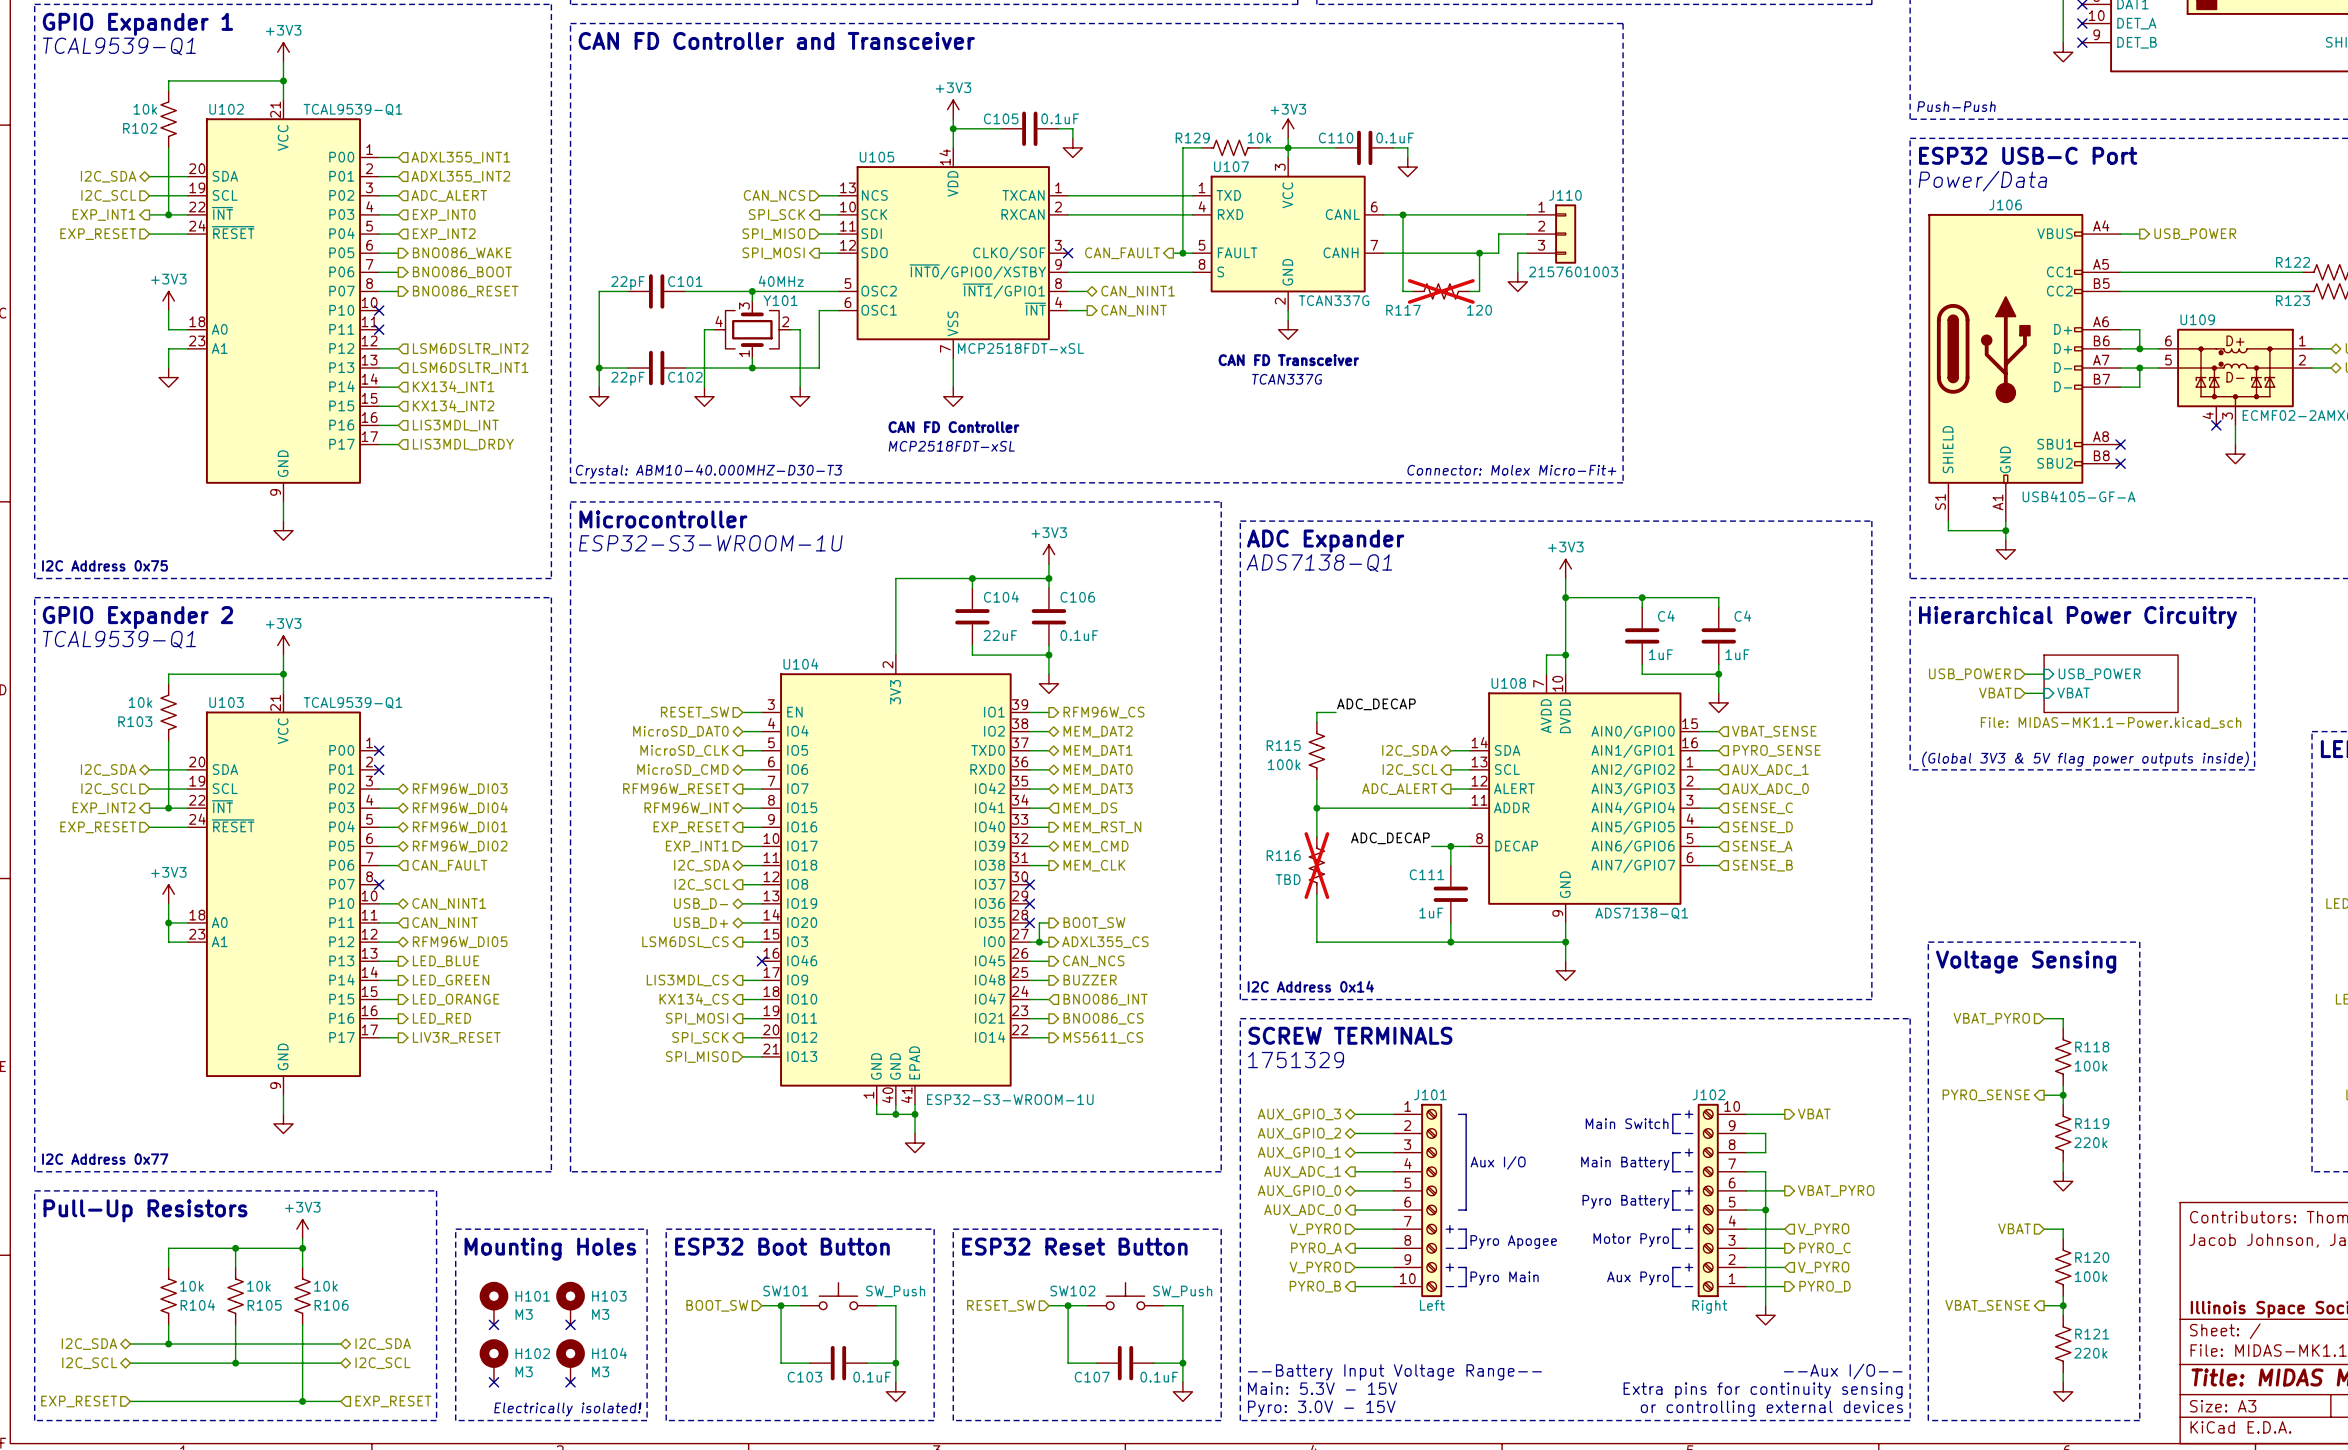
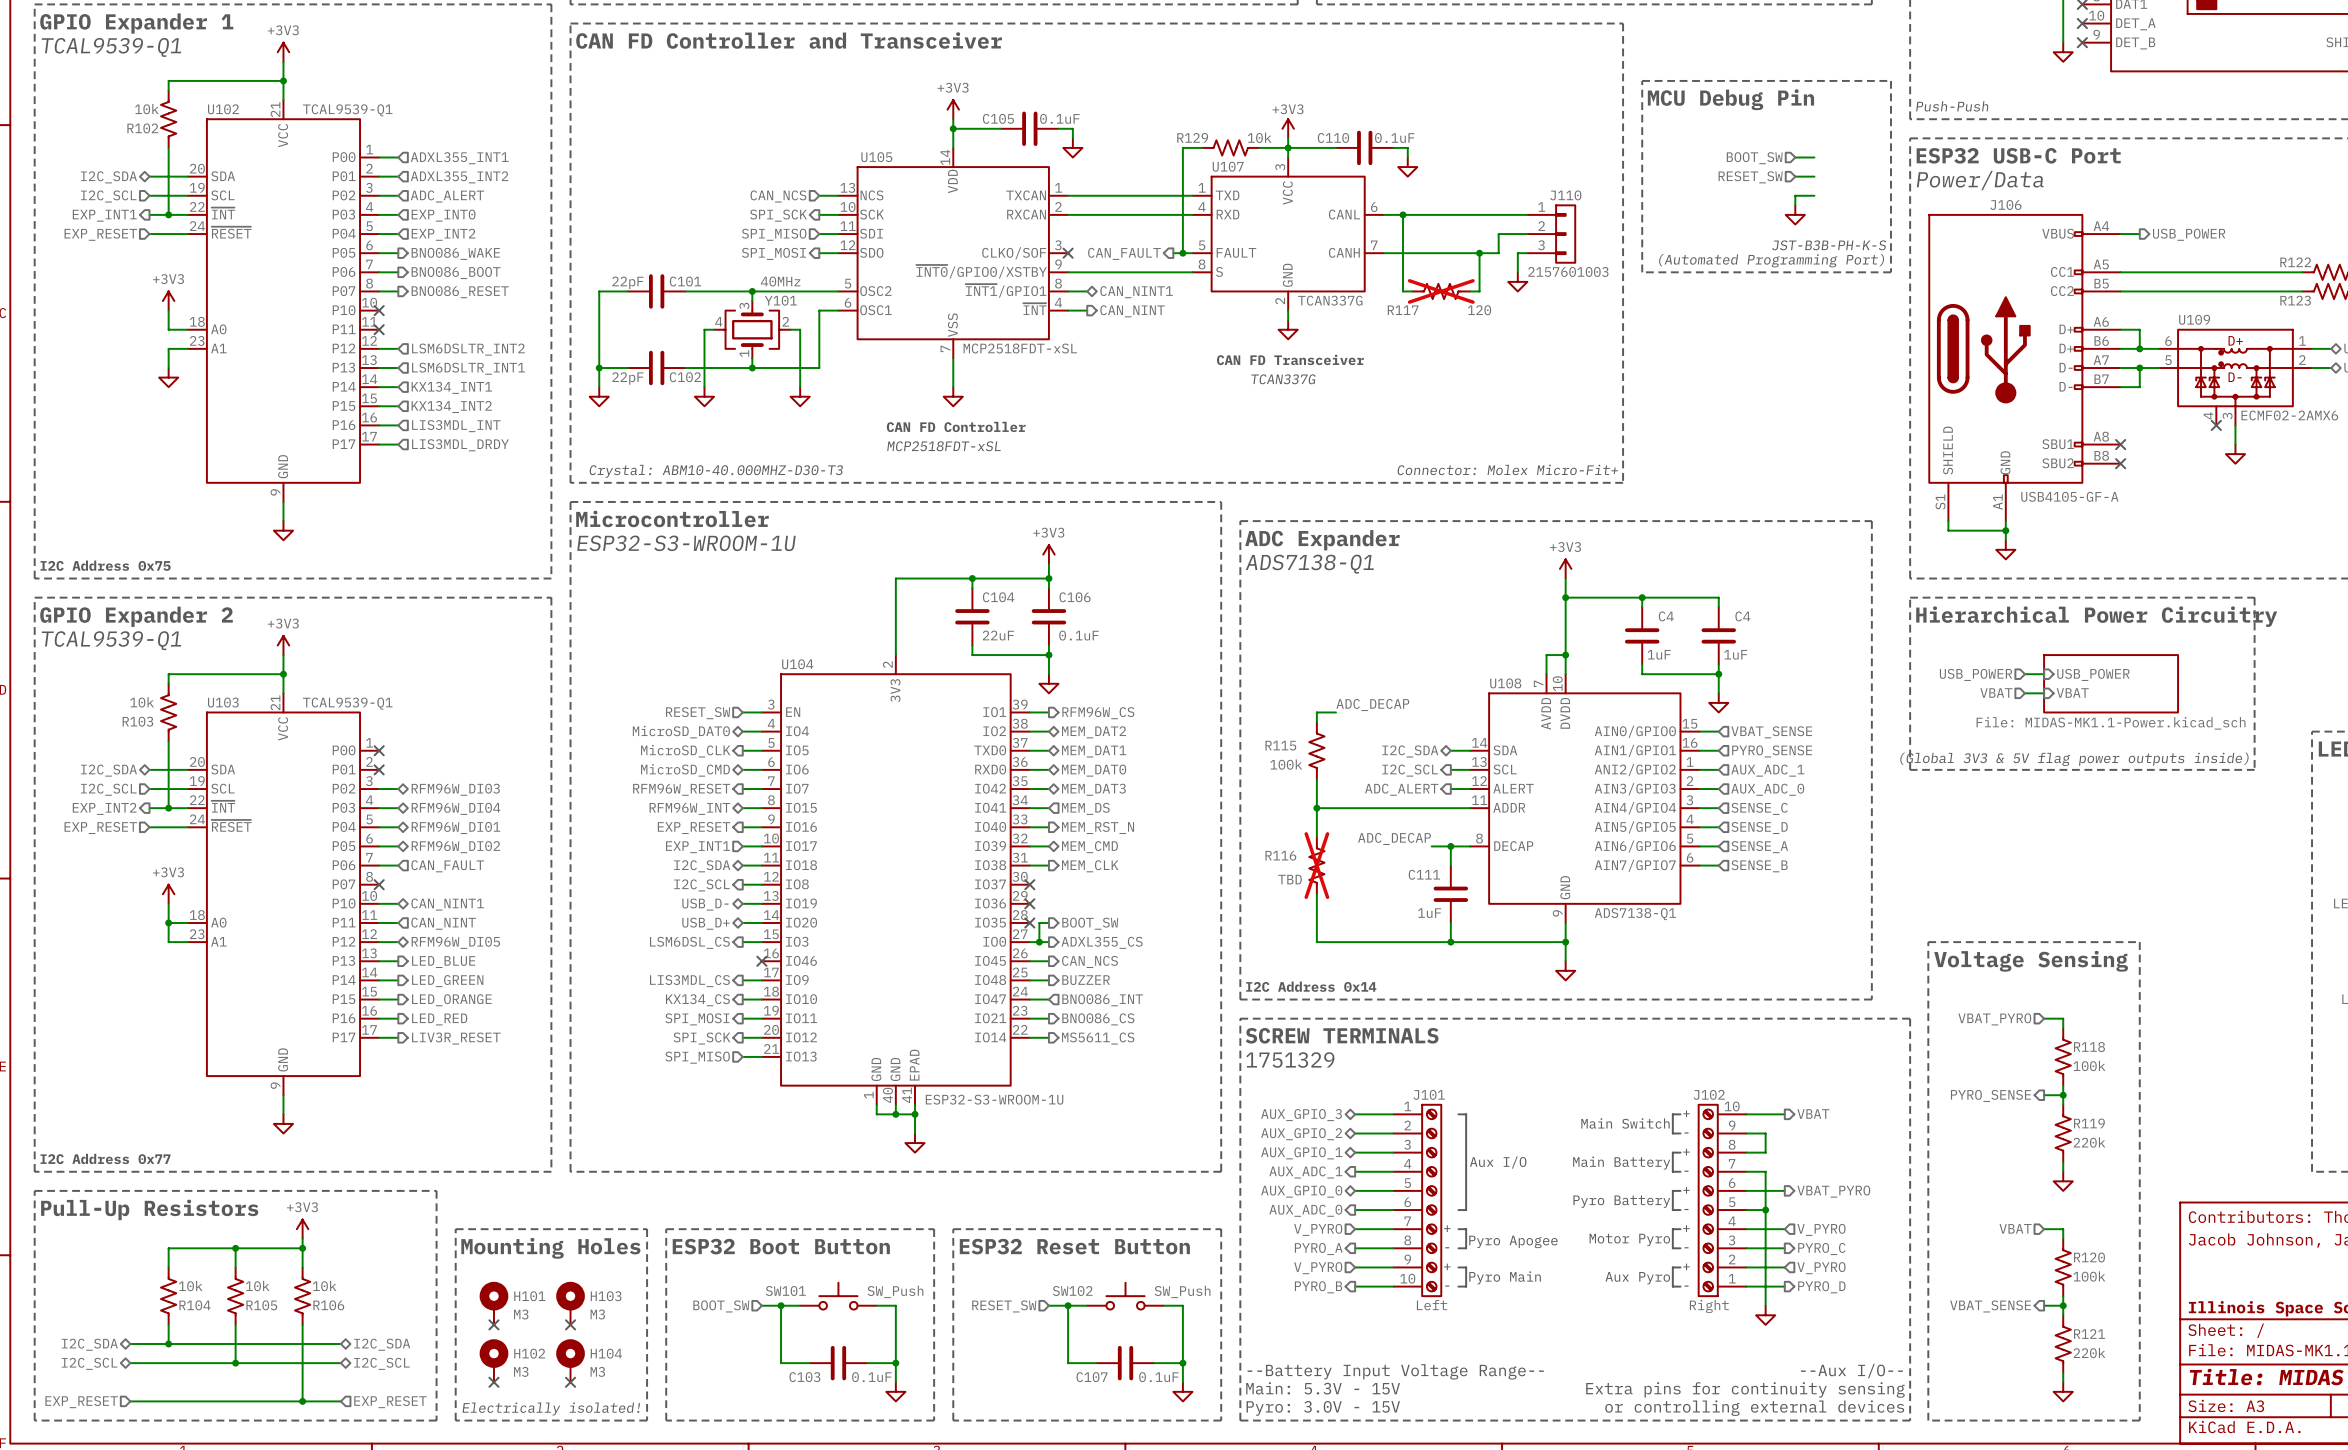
line: none -> (1642, 80) (1890, 80) (1890, 272) (1642, 272) (1642, 80)
text: none -> MCU Debug Pin (1730, 99)
hierarchical label: none -> BOOT_SW (1754, 158)
wire: none -> (1795, 157) (1814, 157)
hierarchical label: none -> RESET_SW (1750, 177)
wire: none -> (1795, 176) (1814, 176)
wire: none -> (1814, 195) (1795, 195) (1795, 205)
power symbol: none -> (1795, 214)
text: none -> JST-B3B-PH-K-S (1829, 245)
text: none -> (Automated Programming Port) (1771, 260)

